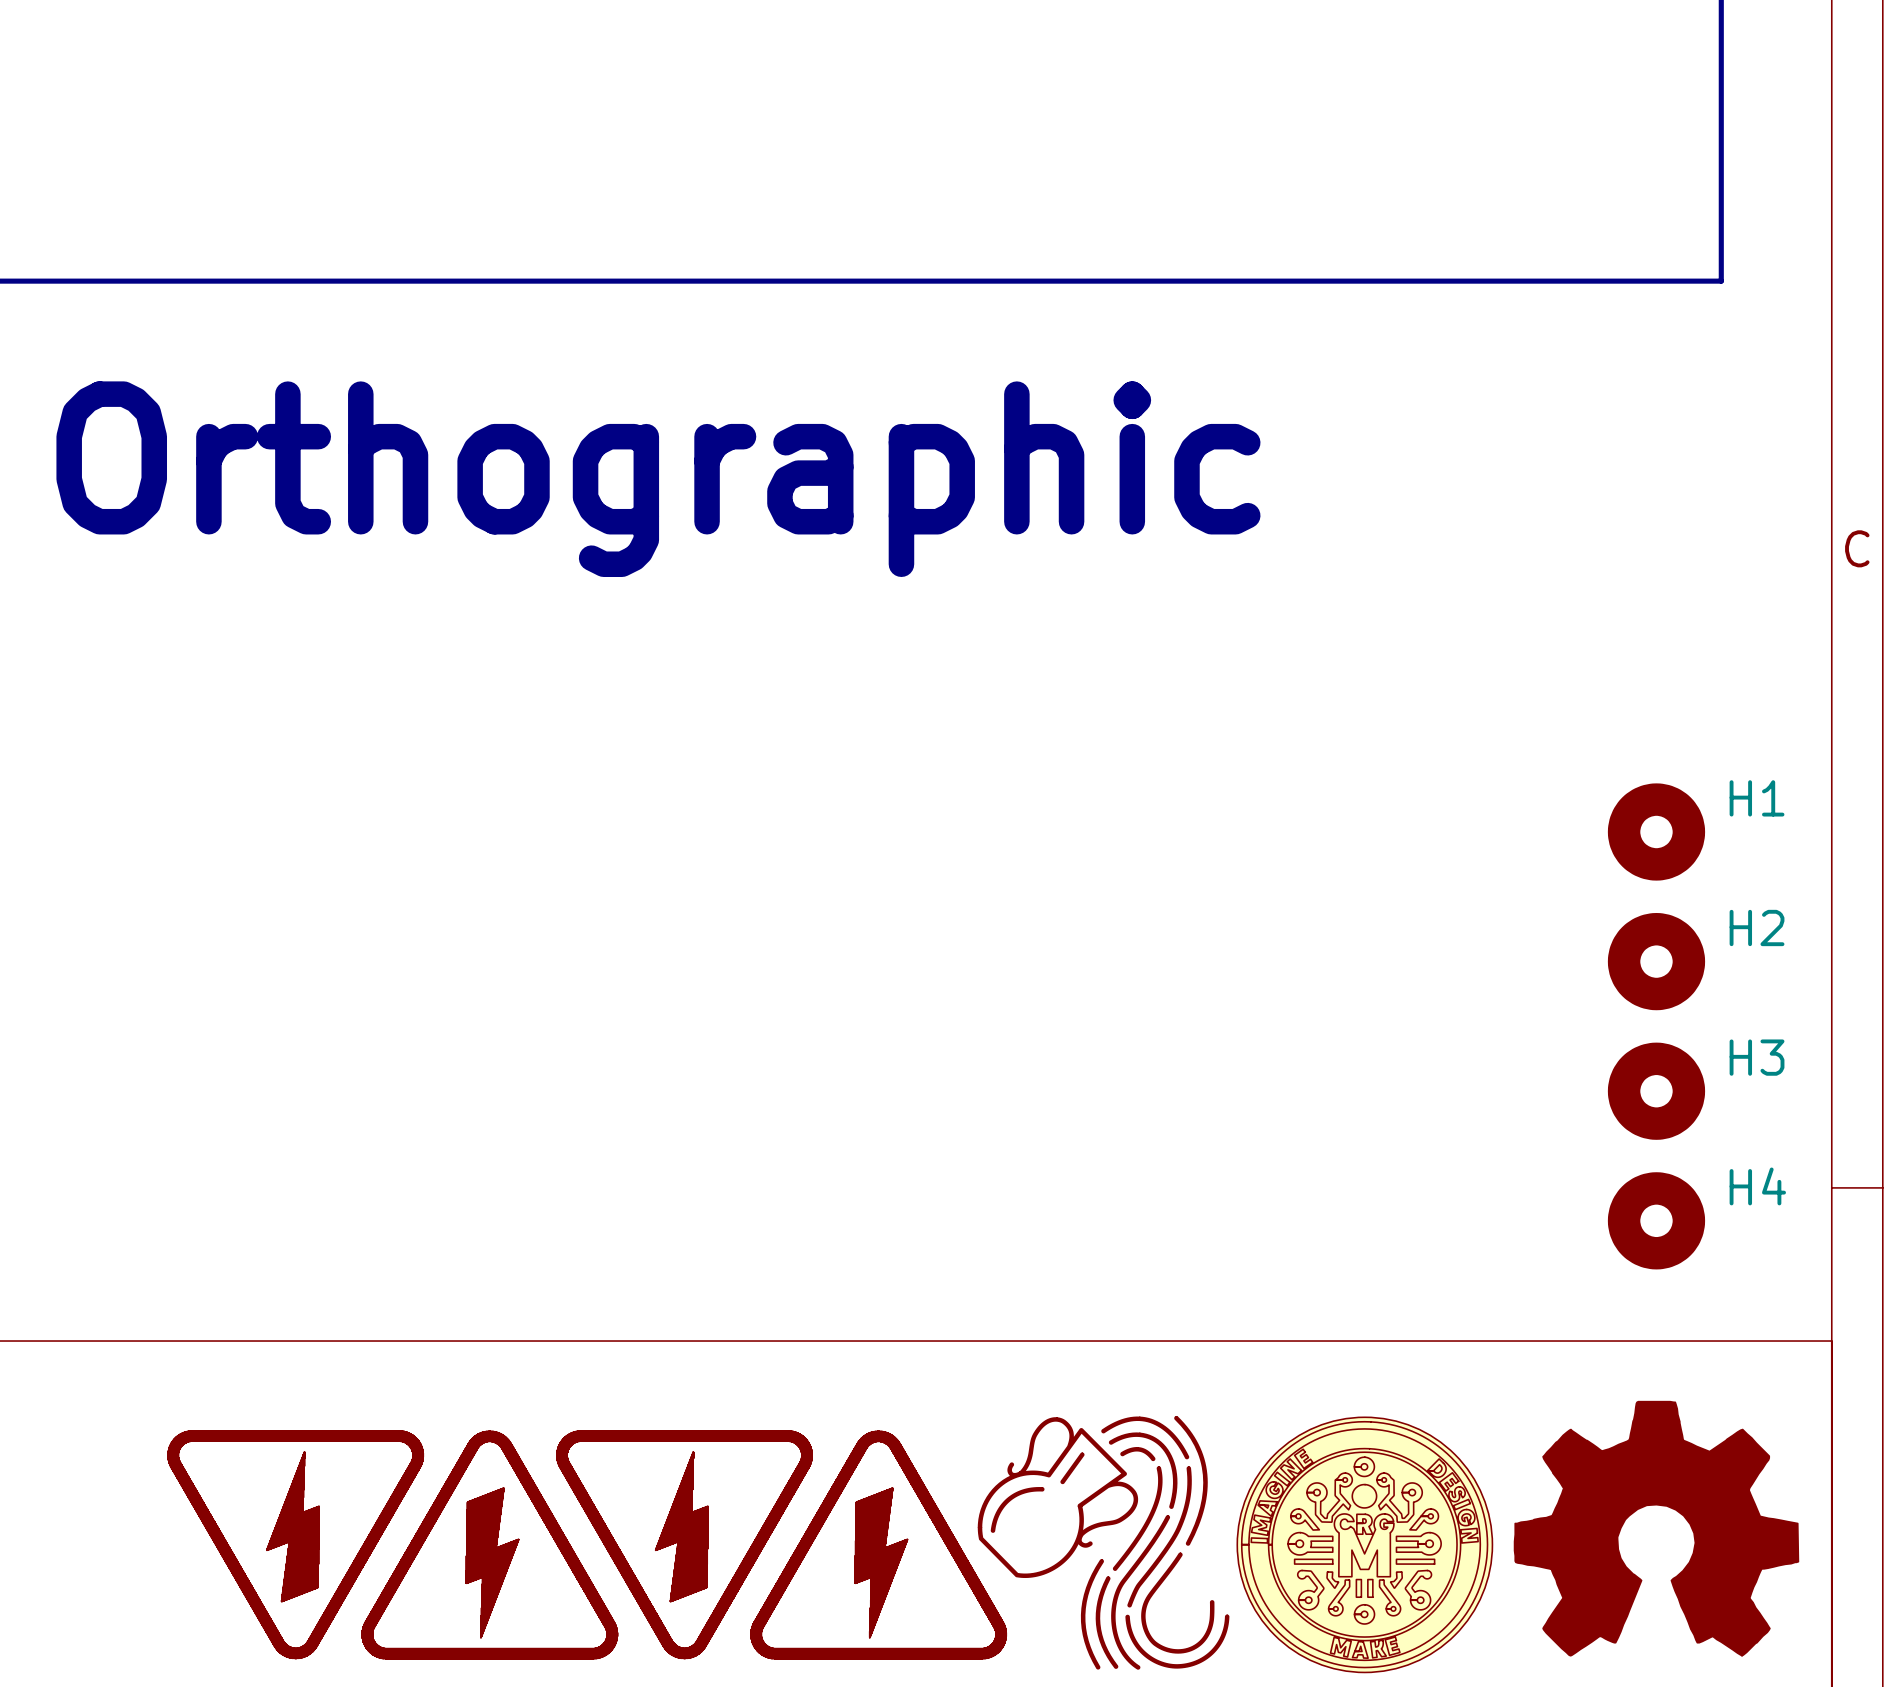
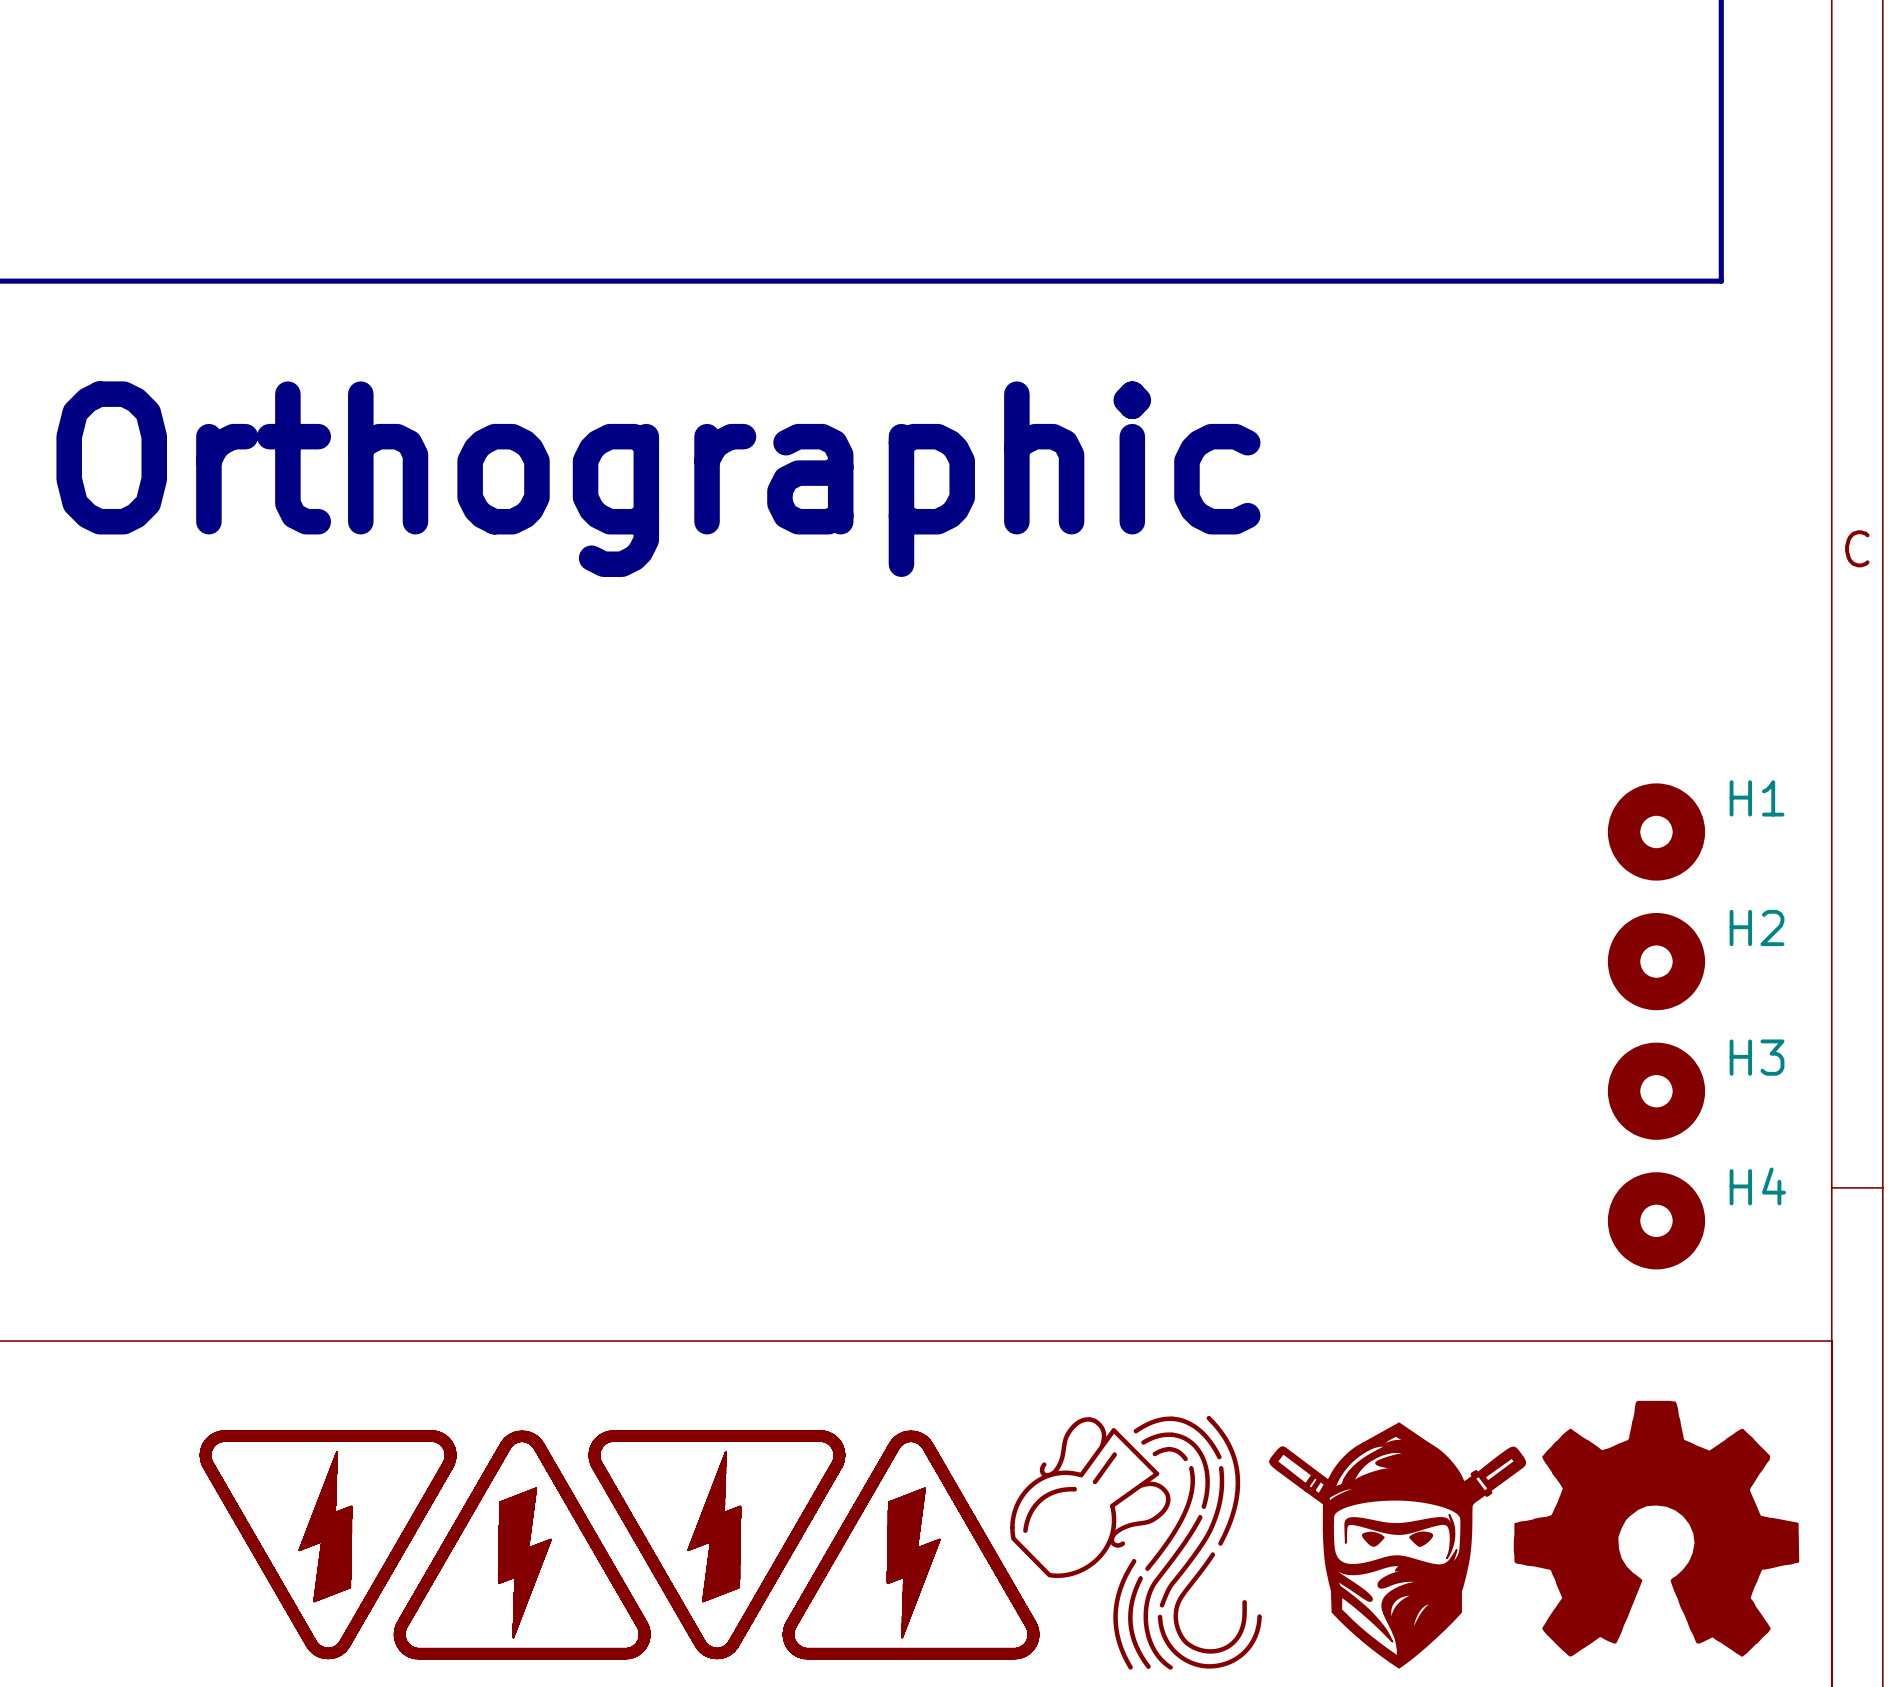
part position: (1103, 1542) -> (1135, 1542)
part position: (295, 1544) -> (328, 1544)
part position: (684, 1544) -> (716, 1544)
part: (1364, 1544) -> none
part position: (489, 1545) -> (522, 1545)
part position: (878, 1545) -> (911, 1545)
part: none -> (1397, 1545)

